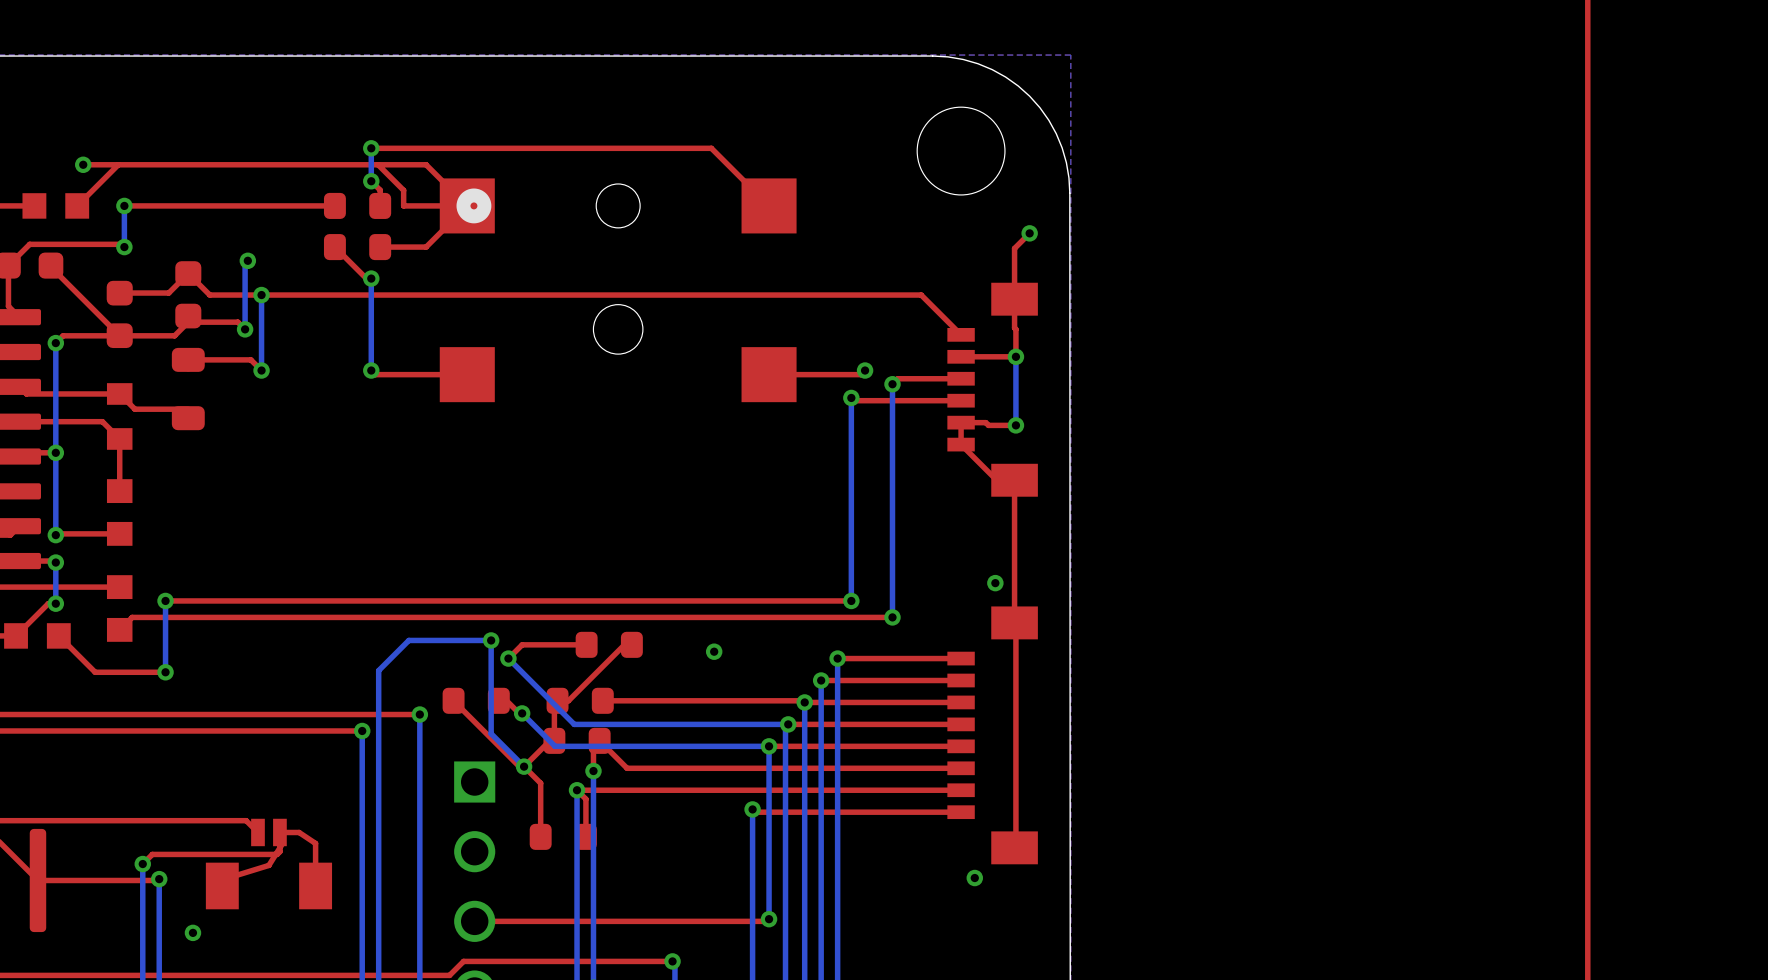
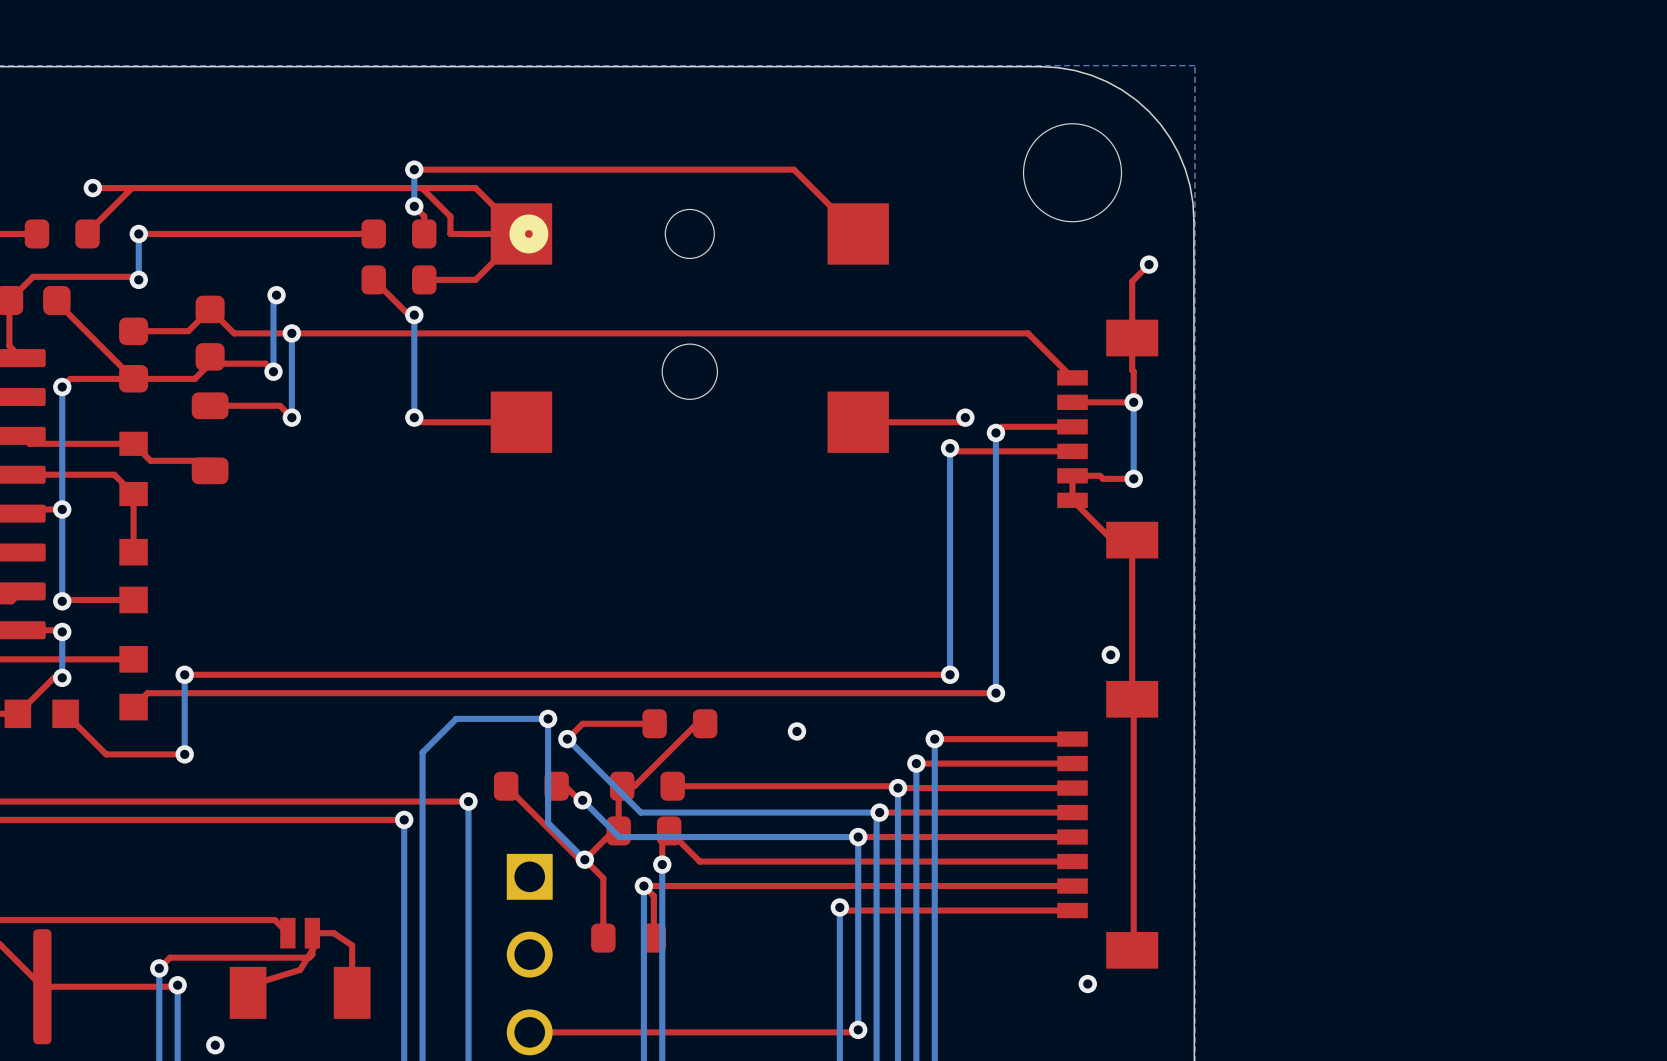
part footprint: [22, 193, 90, 219] -> [24, 219, 100, 249]

